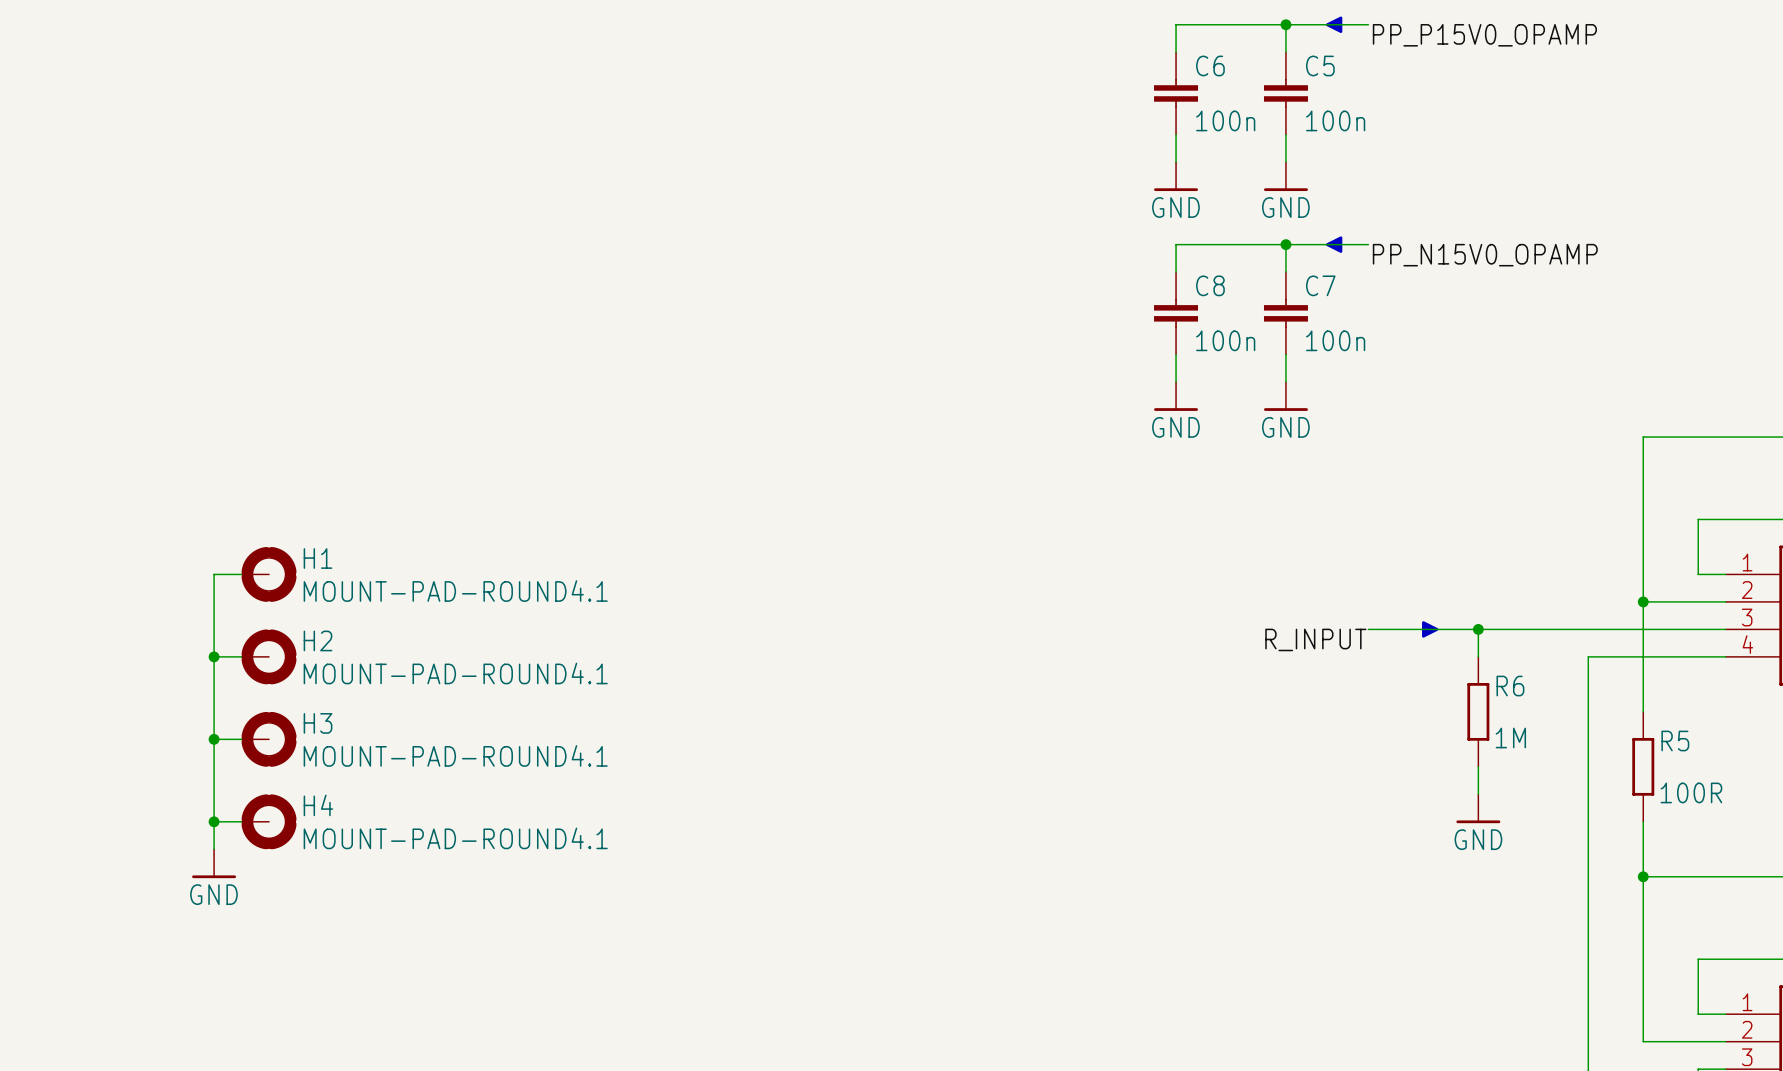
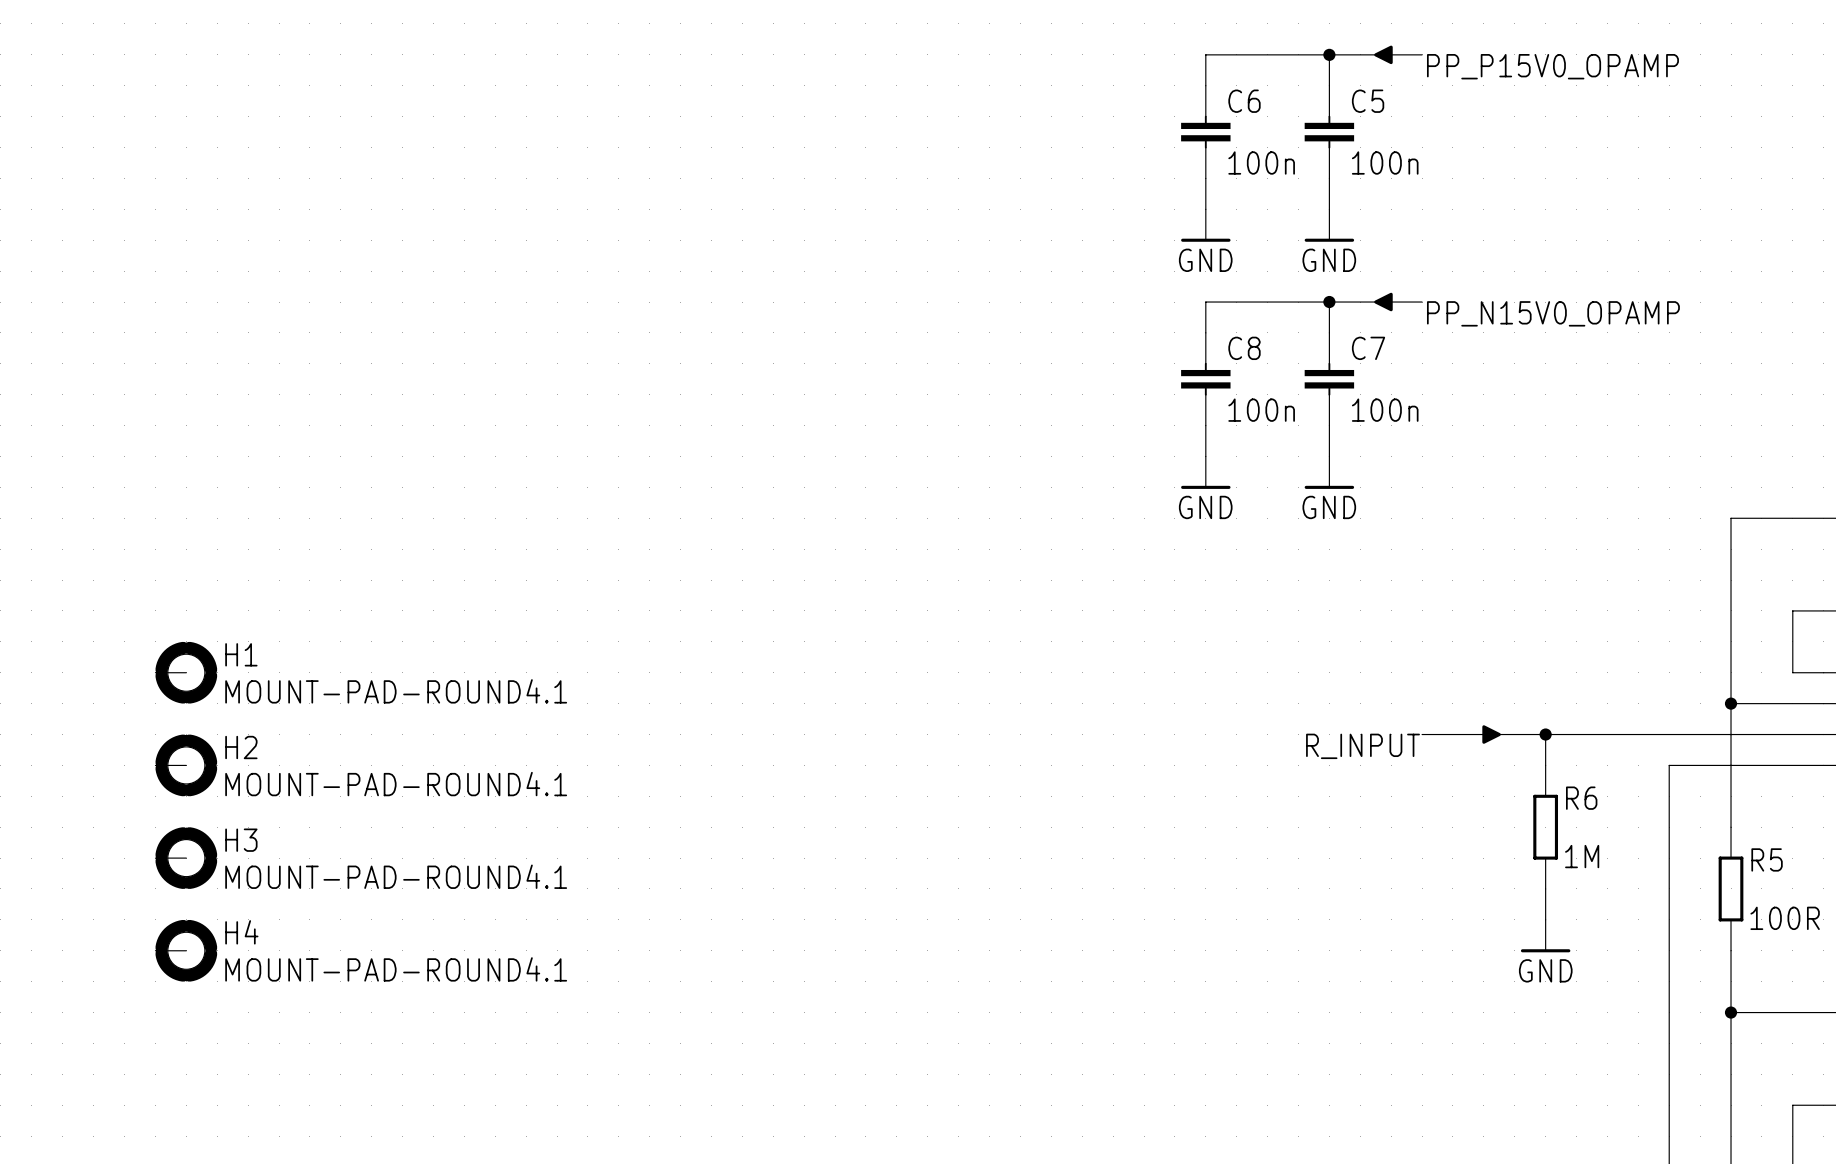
wire: (241, 574) (214, 574) (214, 849) -> none
wire: (214, 656) (241, 656) -> none
junction: (214, 656) -> none
wire: (214, 739) (241, 739) -> none
junction: (214, 739) -> none
wire: (214, 821) (241, 821) -> none
junction: (214, 821) -> none
power symbol: GND (214, 863) -> none

